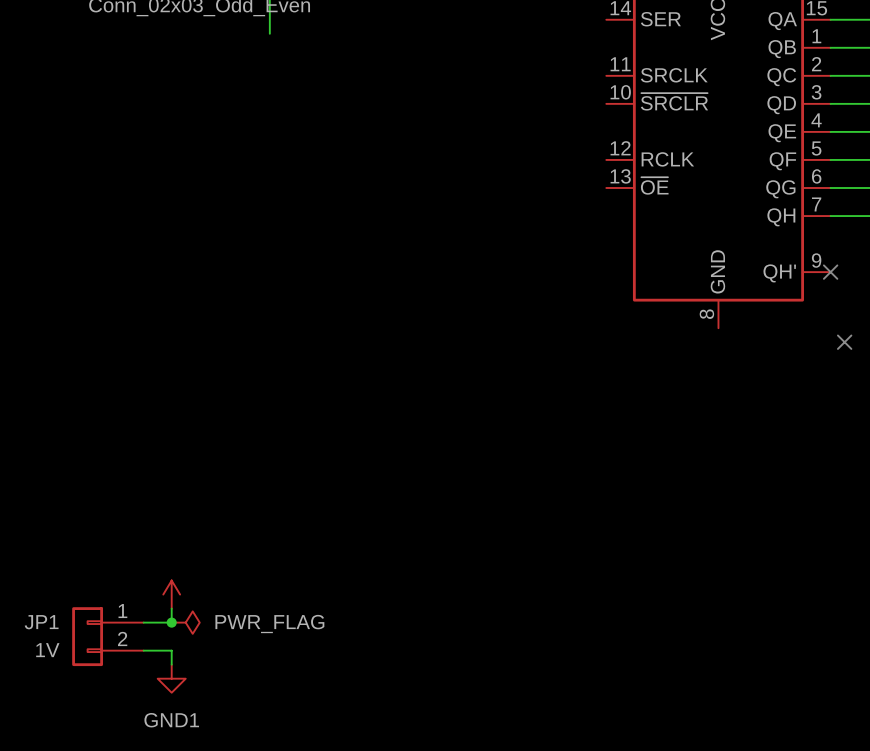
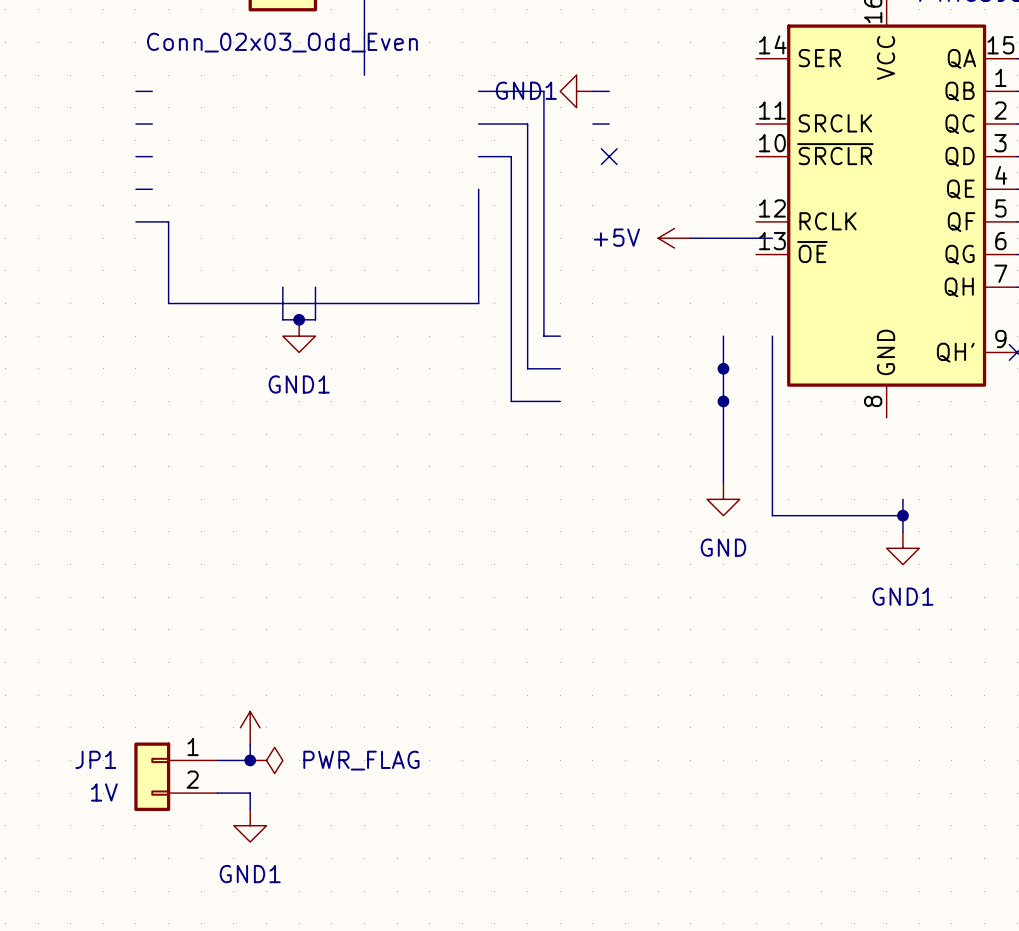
wire: none -> (135, 91) (152, 91)
wire: none -> (478, 91) (543, 91) (543, 336) (560, 336)
power symbol: none -> GND1 (576, 91)
wire: none -> (592, 91) (609, 91)
wire: none -> (135, 124) (152, 124)
wire: none -> (478, 124) (527, 124) (527, 368) (560, 368)
wire: none -> (592, 124) (609, 124)
wire: none -> (135, 156) (152, 156)
wire: none -> (478, 156) (511, 156) (511, 401) (560, 401)
no-connect mark: none -> (609, 156)
wire: none -> (135, 189) (152, 189)
wire: none -> (478, 189) (478, 303) (168, 303) (168, 221) (135, 221)
power symbol: none -> +5V (674, 238)
wire: none -> (690, 238) (772, 238)
wire: none -> (282, 287) (282, 319) (315, 319) (315, 287)
junction: none -> (299, 319)
power symbol: none -> GND1 (299, 336)
wire: none -> (723, 336) (723, 483)
wire: none -> (772, 336) (772, 515) (902, 515)
junction: none -> (723, 368)
junction: none -> (723, 401)
power symbol: none -> GND (723, 499)
wire: none -> (902, 499) (902, 531)
junction: none -> (902, 515)
power symbol: none -> GND1 (902, 548)

